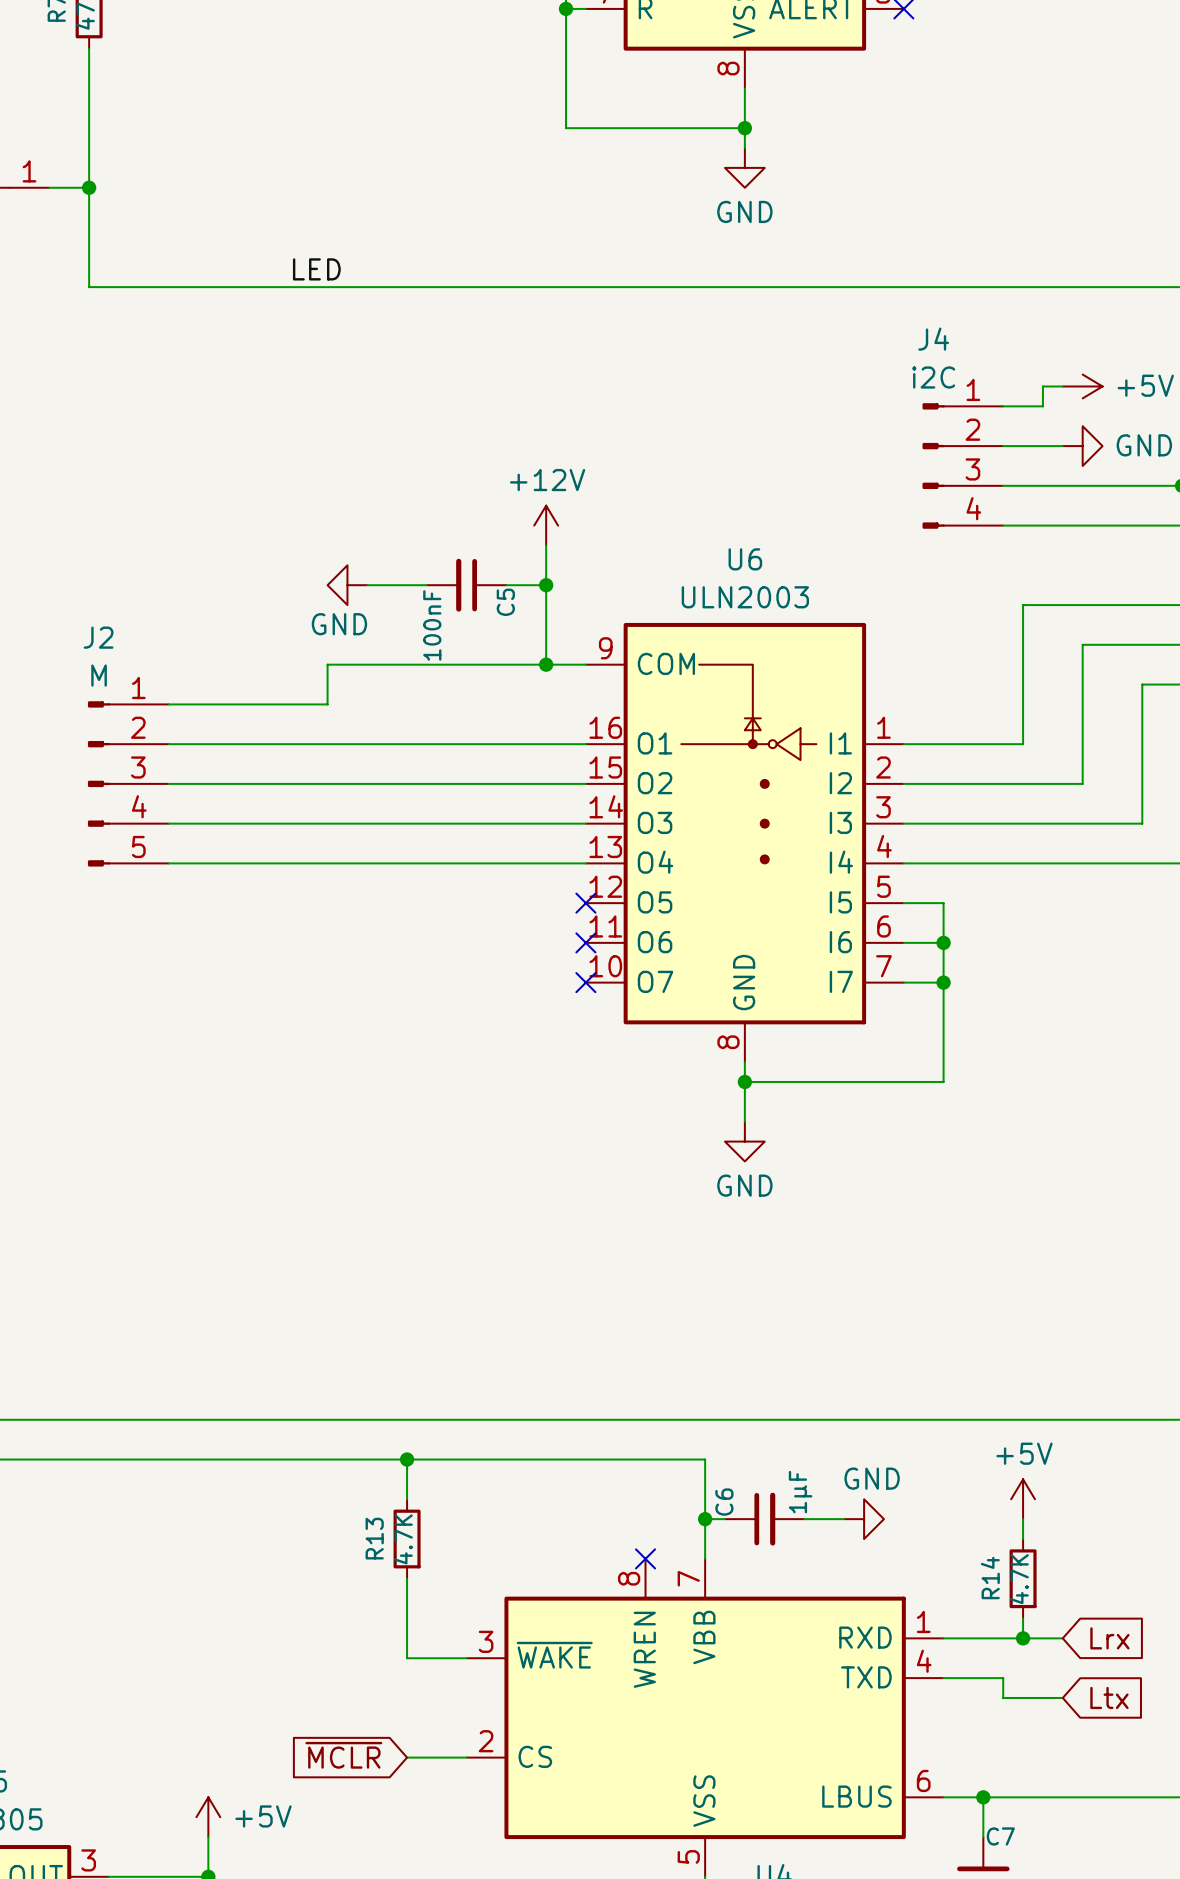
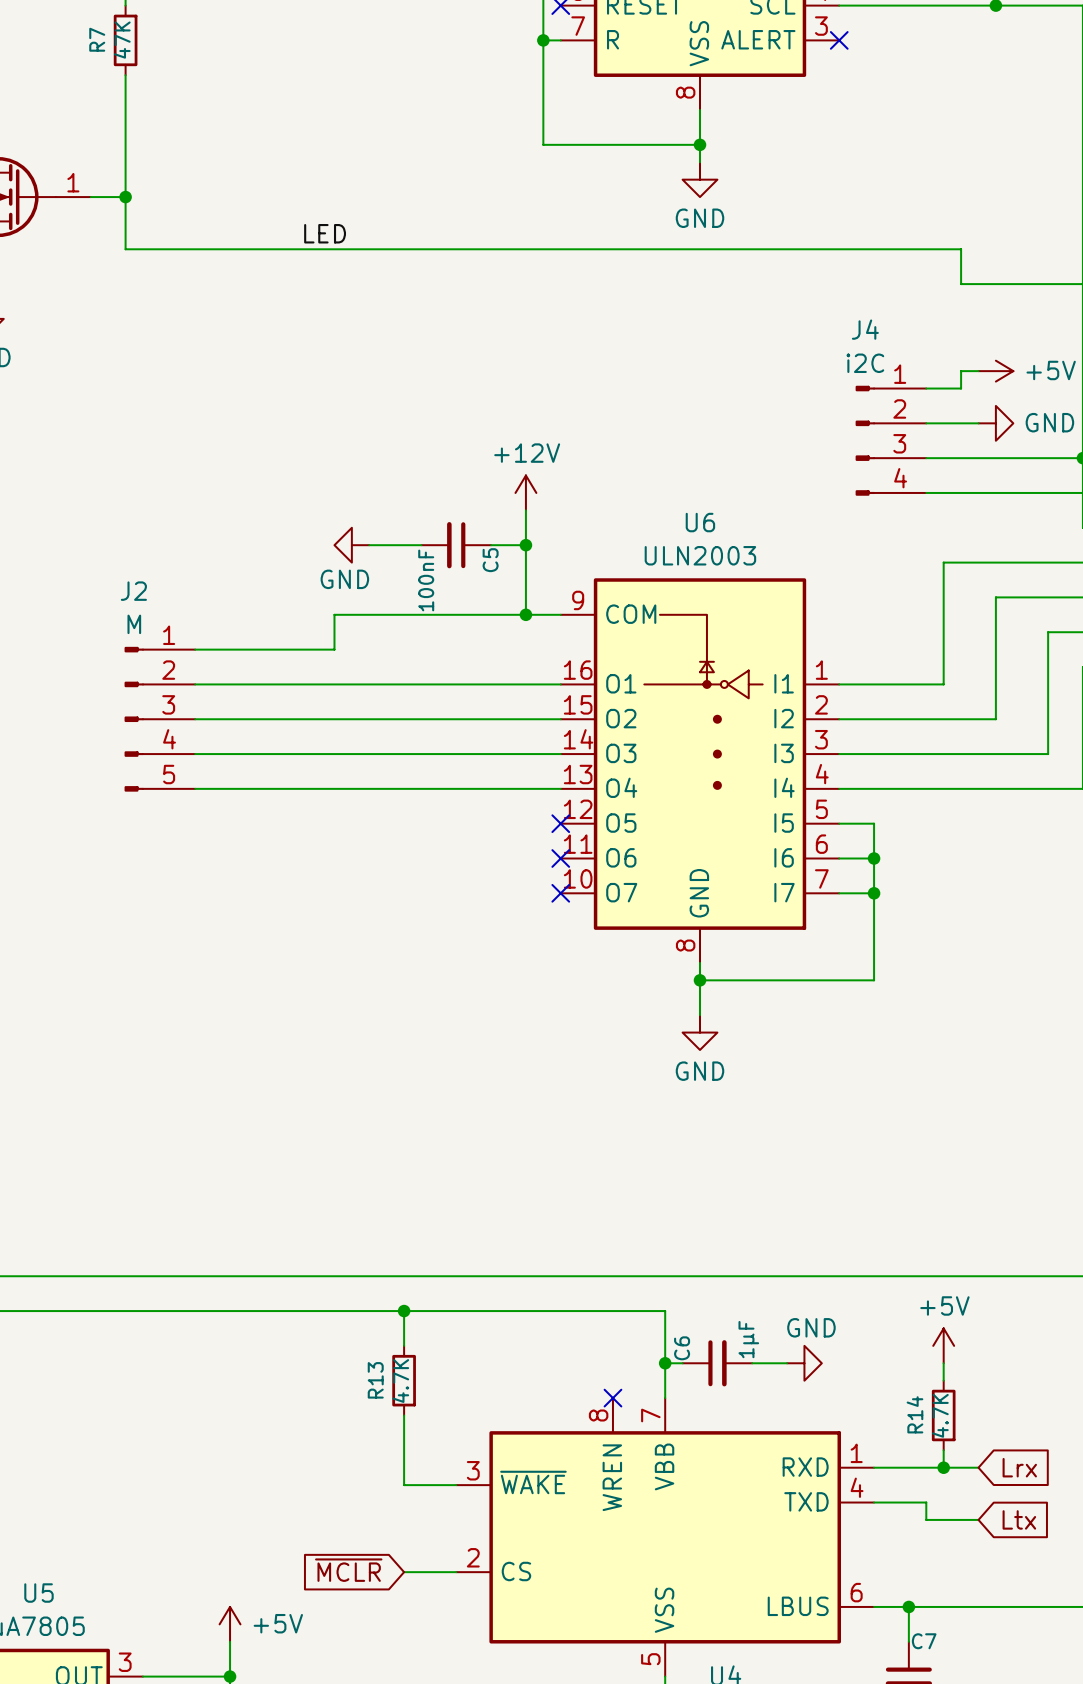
wire: (89, 247) (89, 287) (1042, 287) -> (125, 249) (961, 249) (961, 284)
label position: LED (316, 269) -> LED (325, 233)

